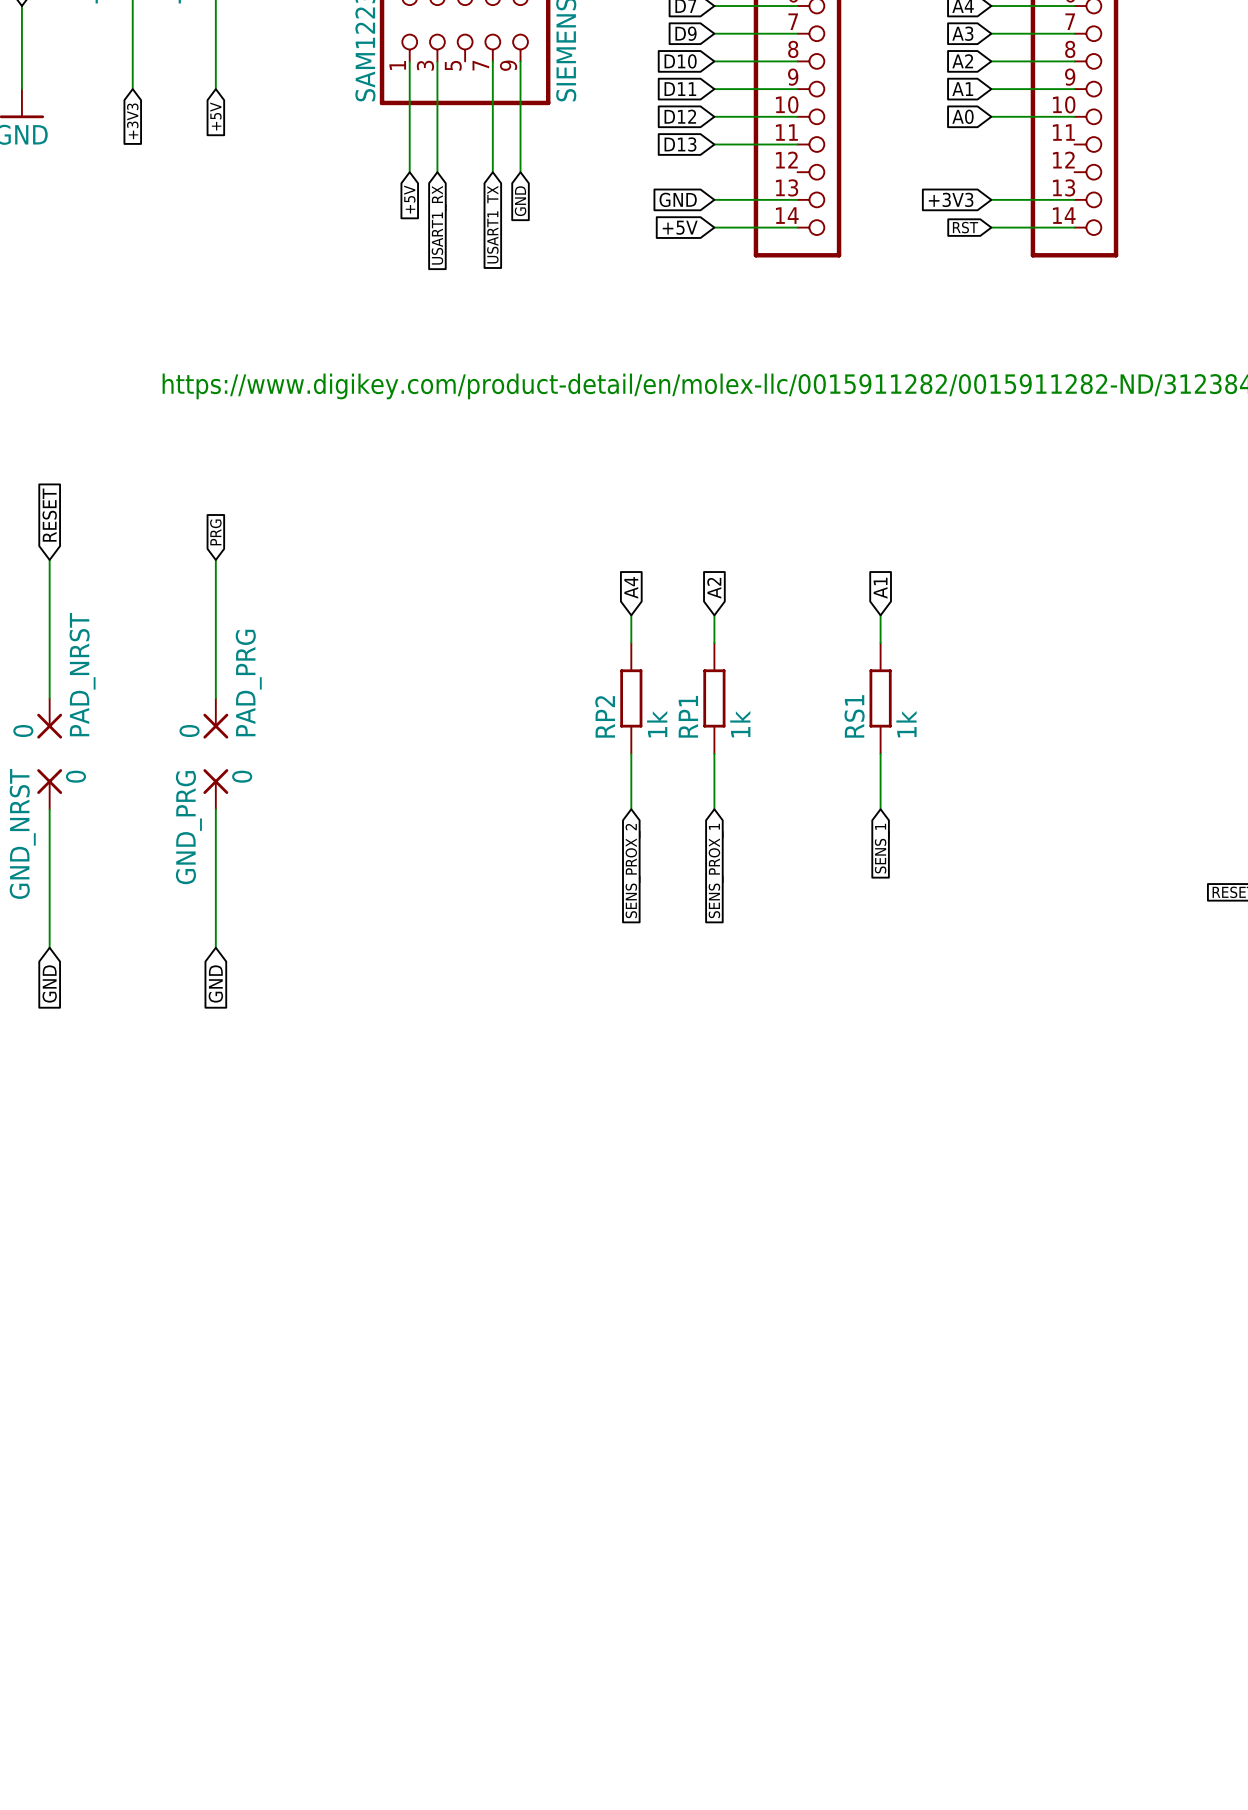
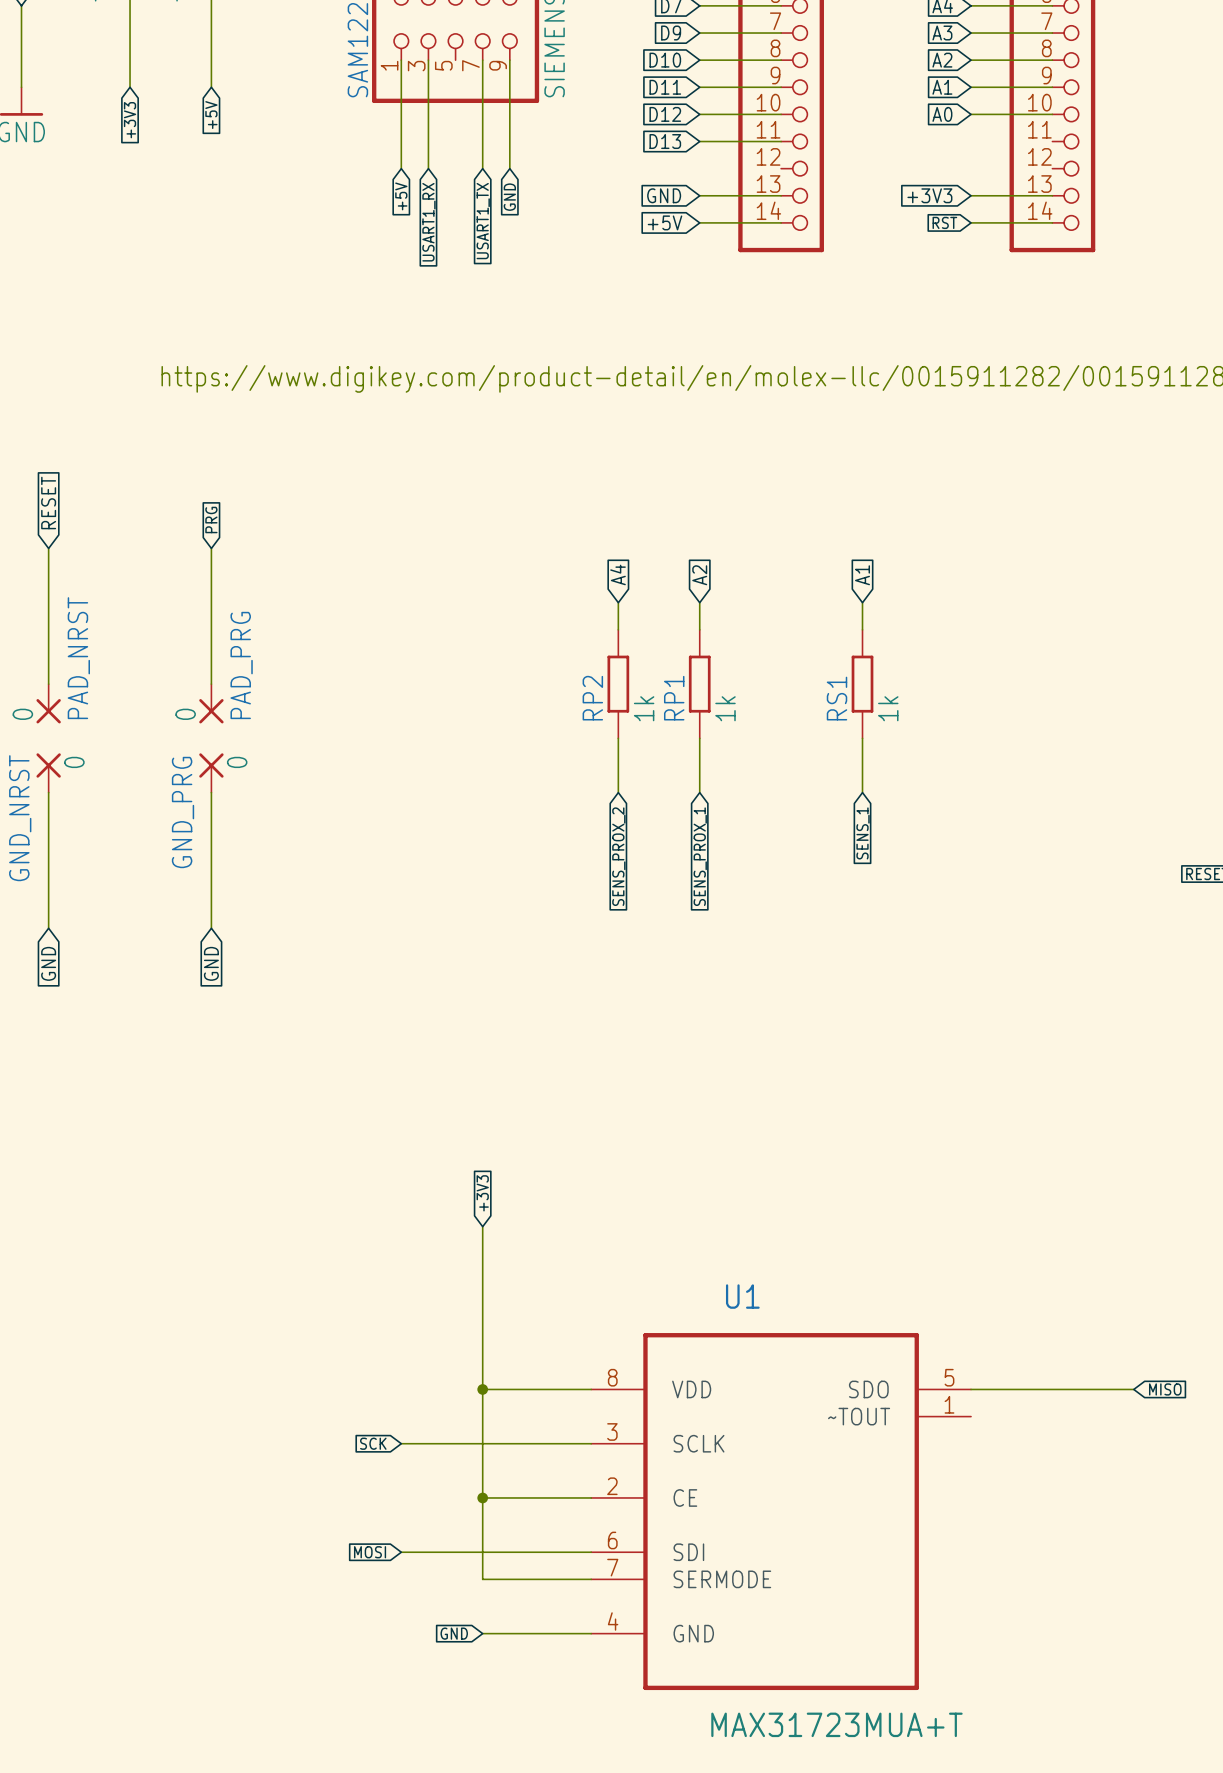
global label: none -> +3V3 (482, 1193)
wire: none -> (482, 1226) (482, 1579) (591, 1579)
wire: none -> (482, 1389) (591, 1389)
junction: none -> (482, 1389)
wire: none -> (971, 1389) (1133, 1389)
global label: none -> MISO (1165, 1389)
global label: none -> SCK (373, 1443)
wire: none -> (401, 1443) (591, 1443)
wire: none -> (482, 1497) (591, 1497)
junction: none -> (482, 1497)
U1: none -> MAX31723MUA+T (781, 1511)
global label: none -> MOSI (370, 1552)
wire: none -> (401, 1552) (591, 1552)
global label: none -> GND (454, 1633)
wire: none -> (482, 1633) (591, 1633)

